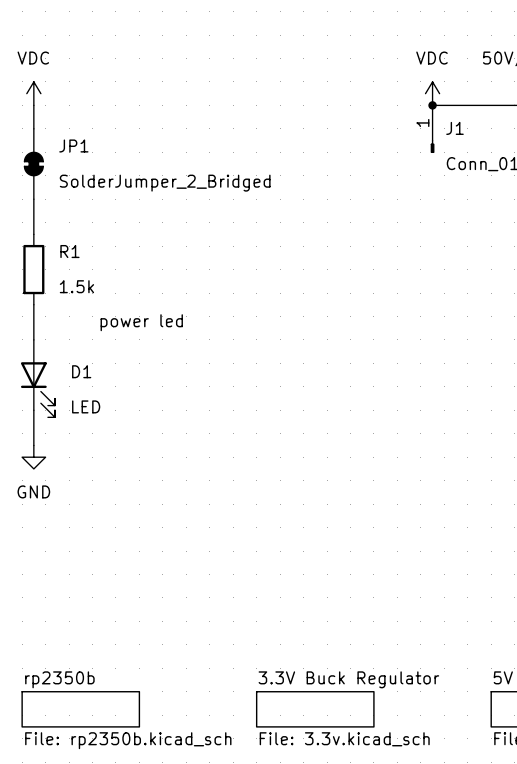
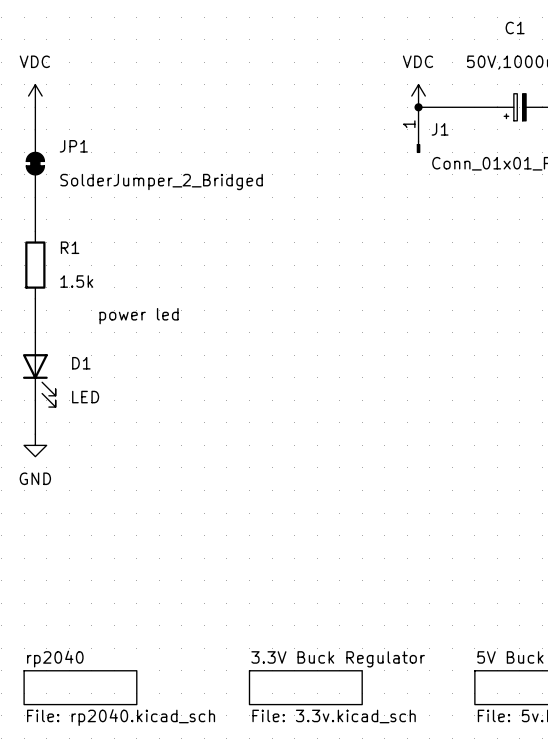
sheet rp2350b name: rp2350b (59, 679) -> rp2040 (55, 659)
sheet rp2350b value: File: rp2350b.kicad_sch (128, 740) -> File: rp2040.kicad_sch (121, 717)

